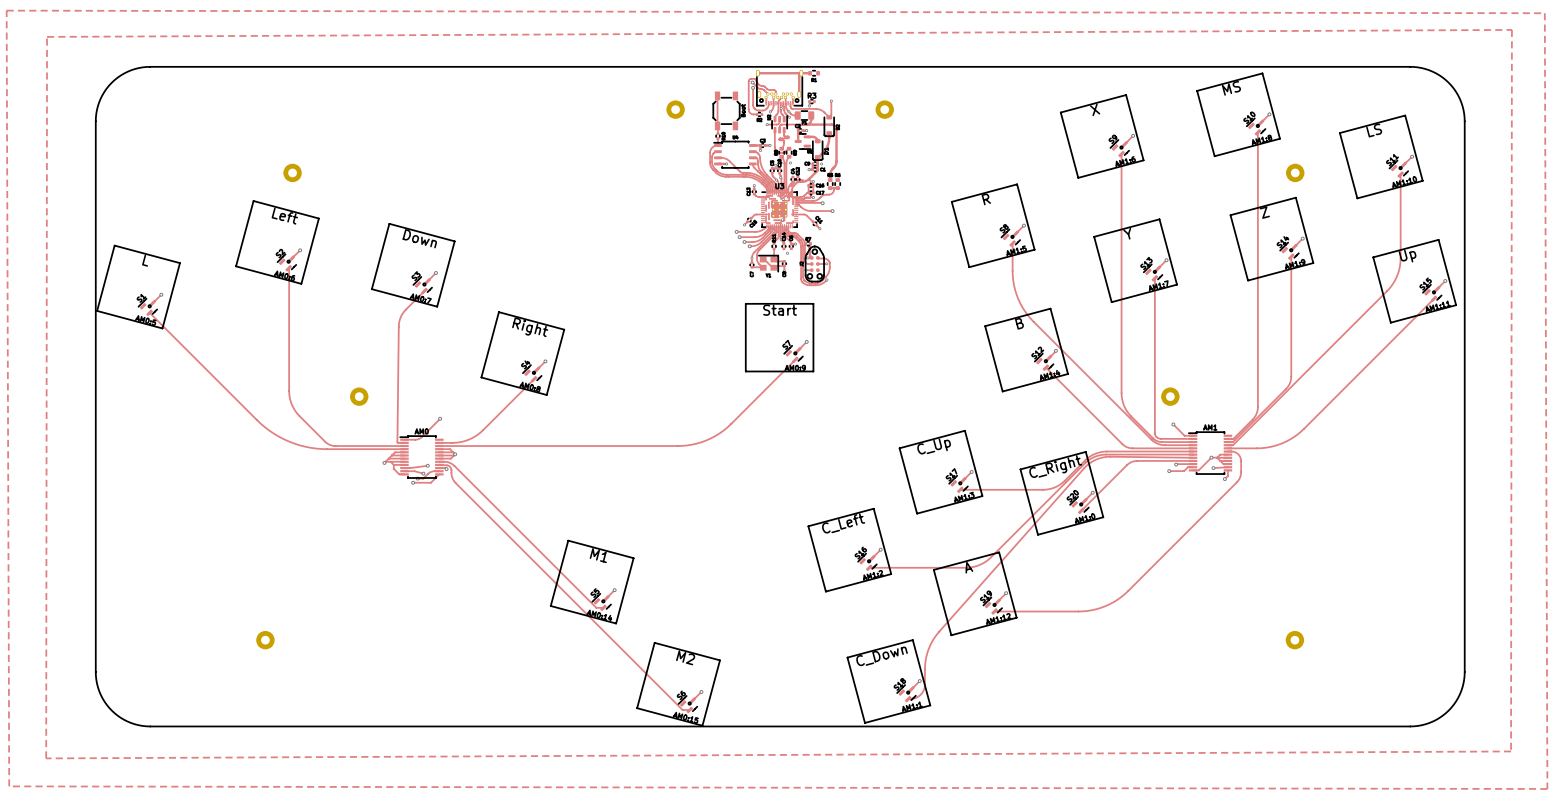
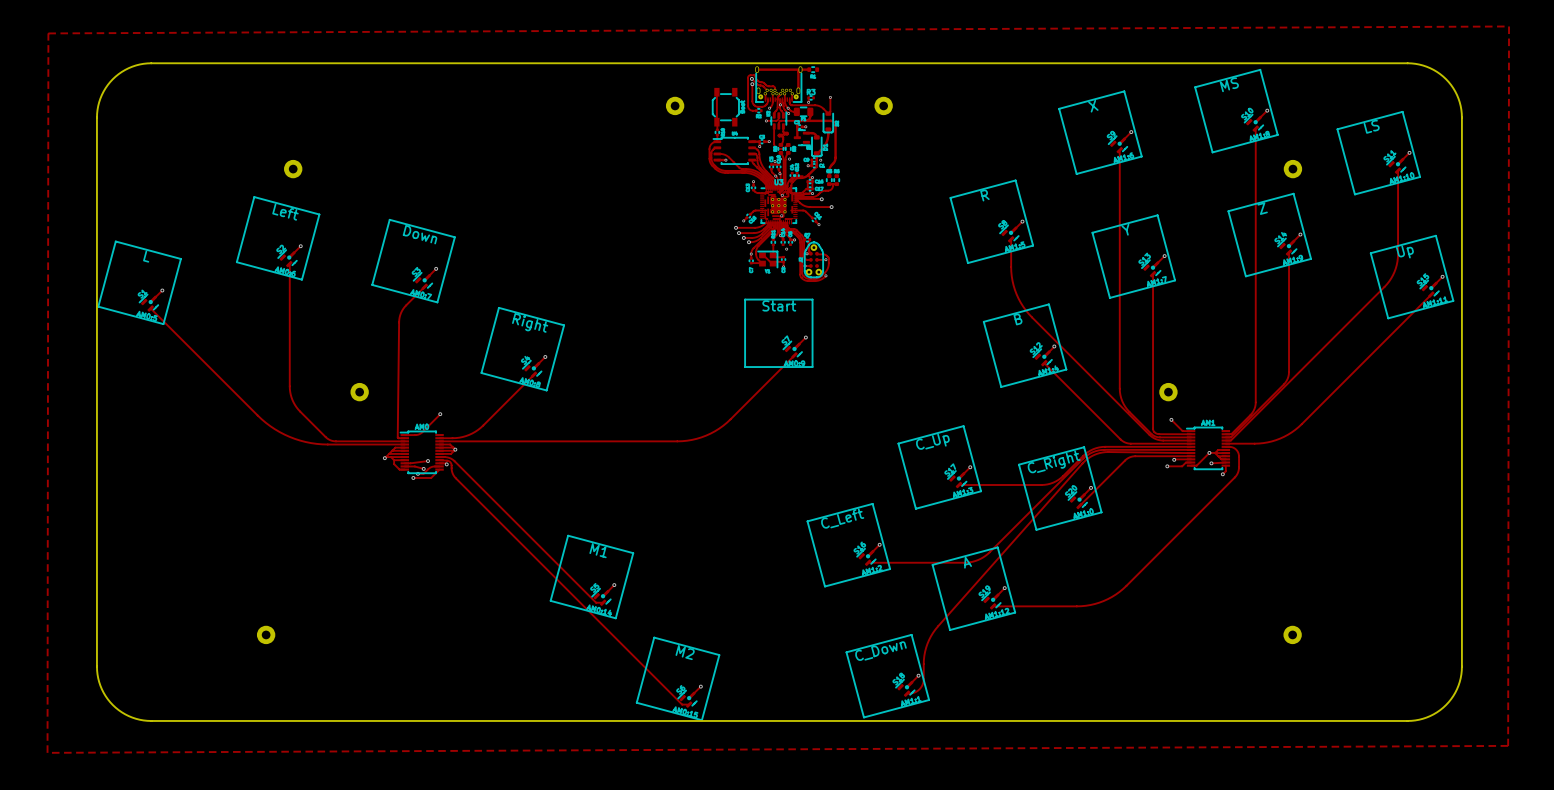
zone outline: (6, 10) (9, 786) (1547, 788) (1544, 13) (6, 10) -> none

